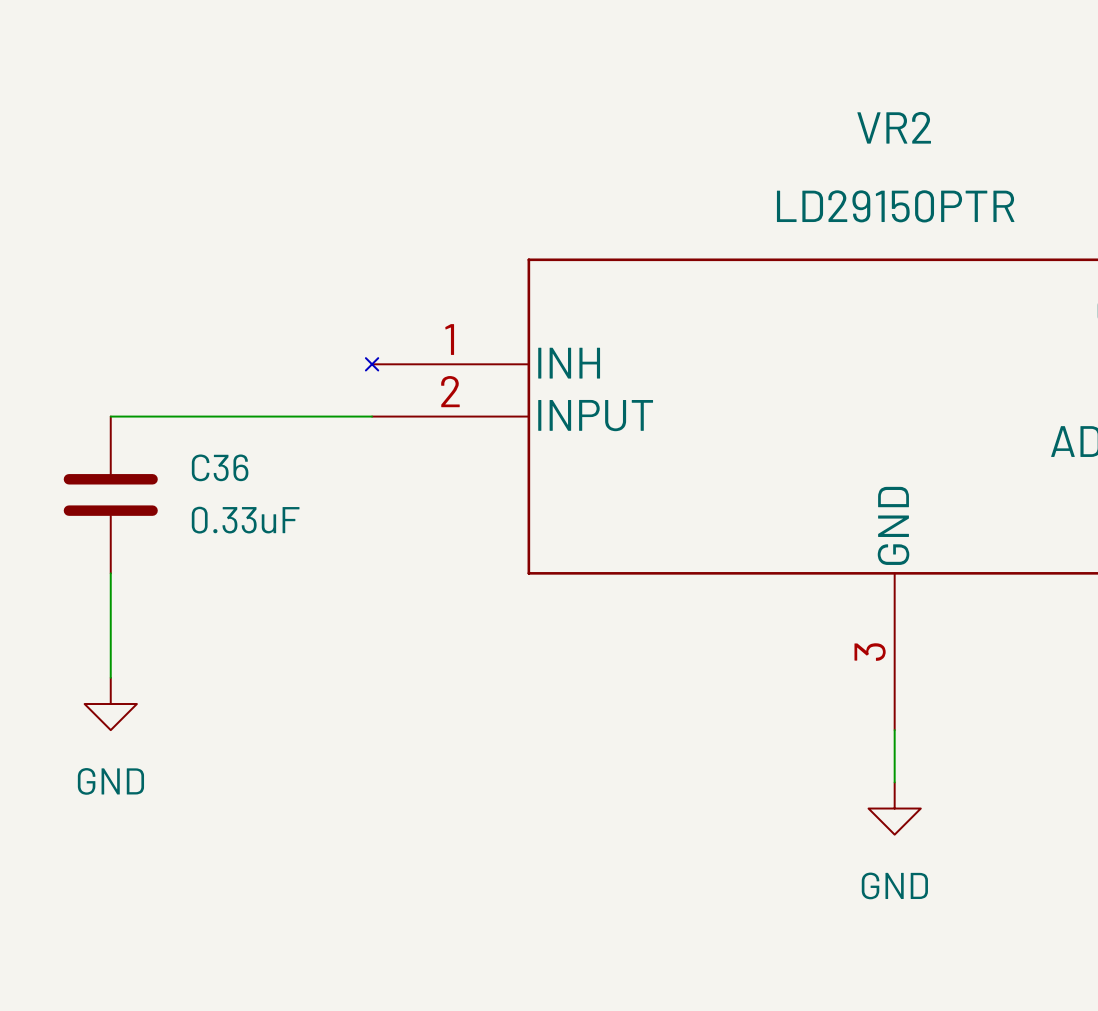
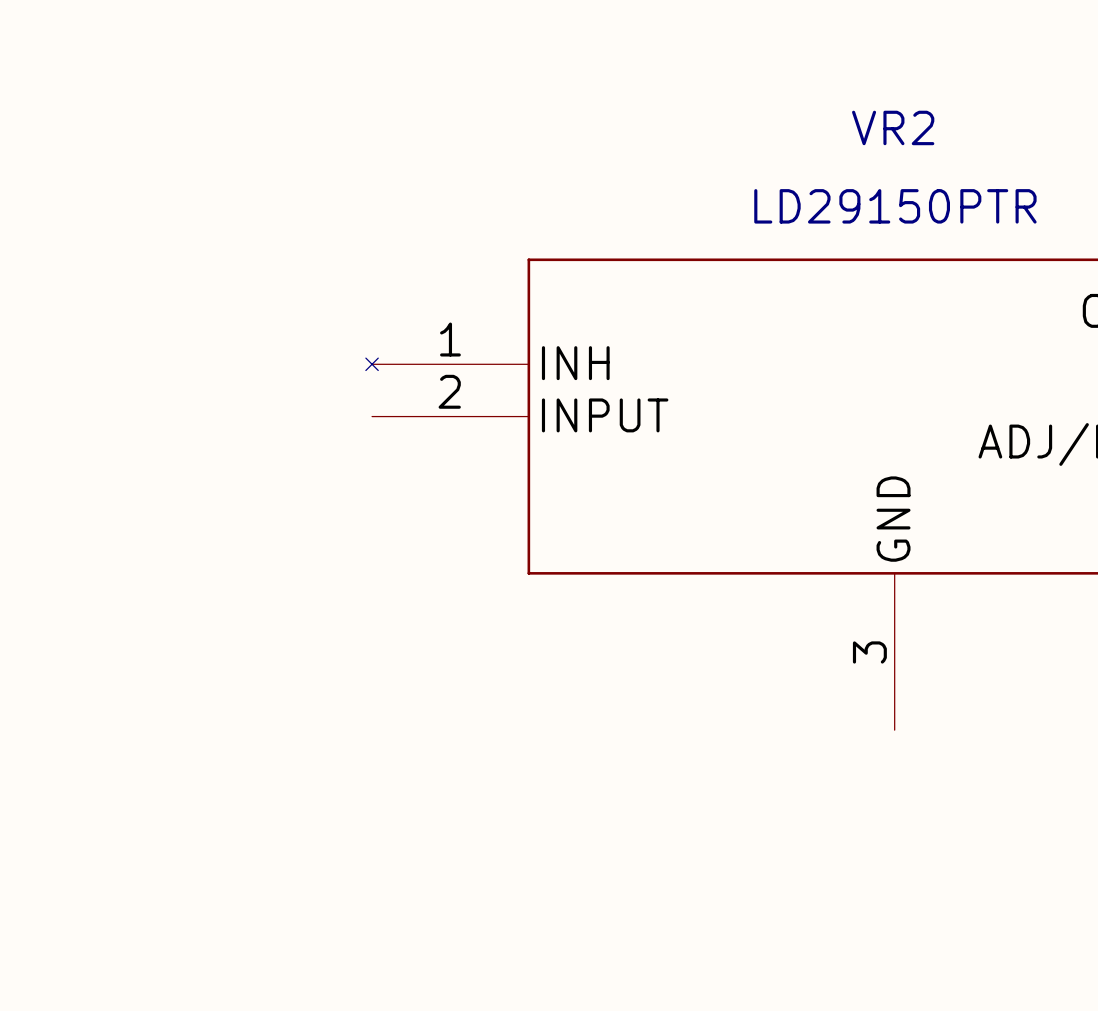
wire: (110, 416) (372, 416) -> none
C36: 0.33uF (110, 494) -> none
wire: (110, 573) (110, 677) -> none
power symbol: GND (110, 704) -> none
wire: (894, 730) (894, 782) -> none
power symbol: GND (894, 808) -> none

